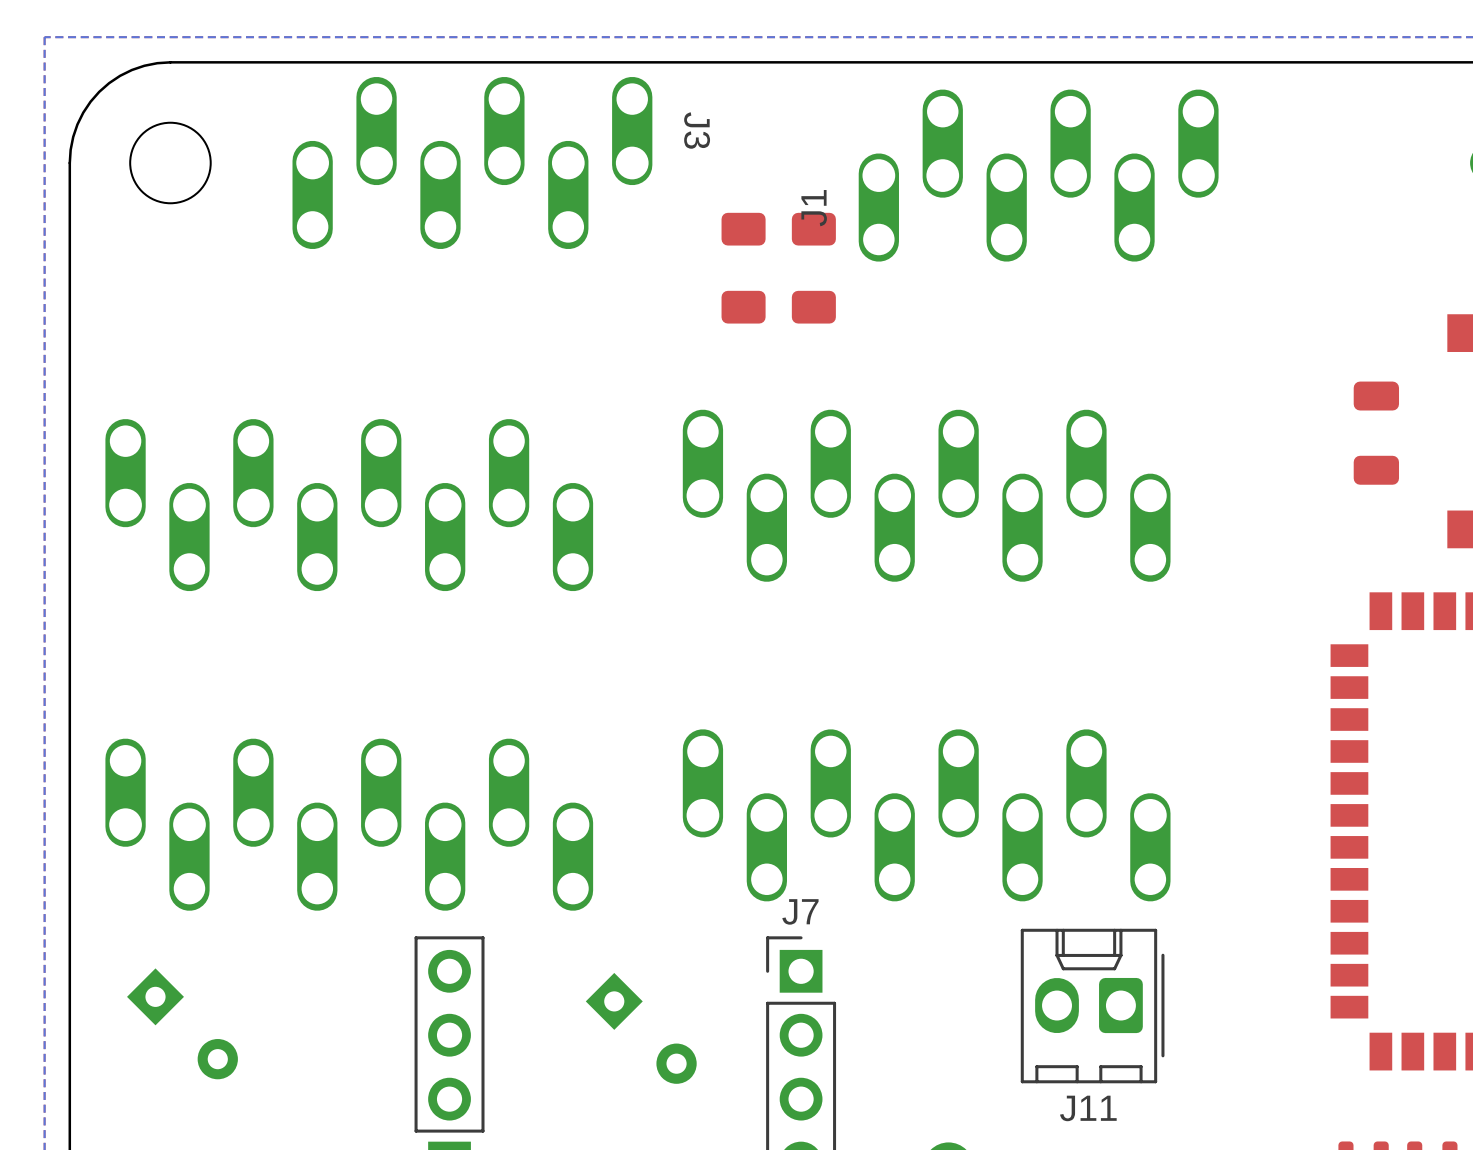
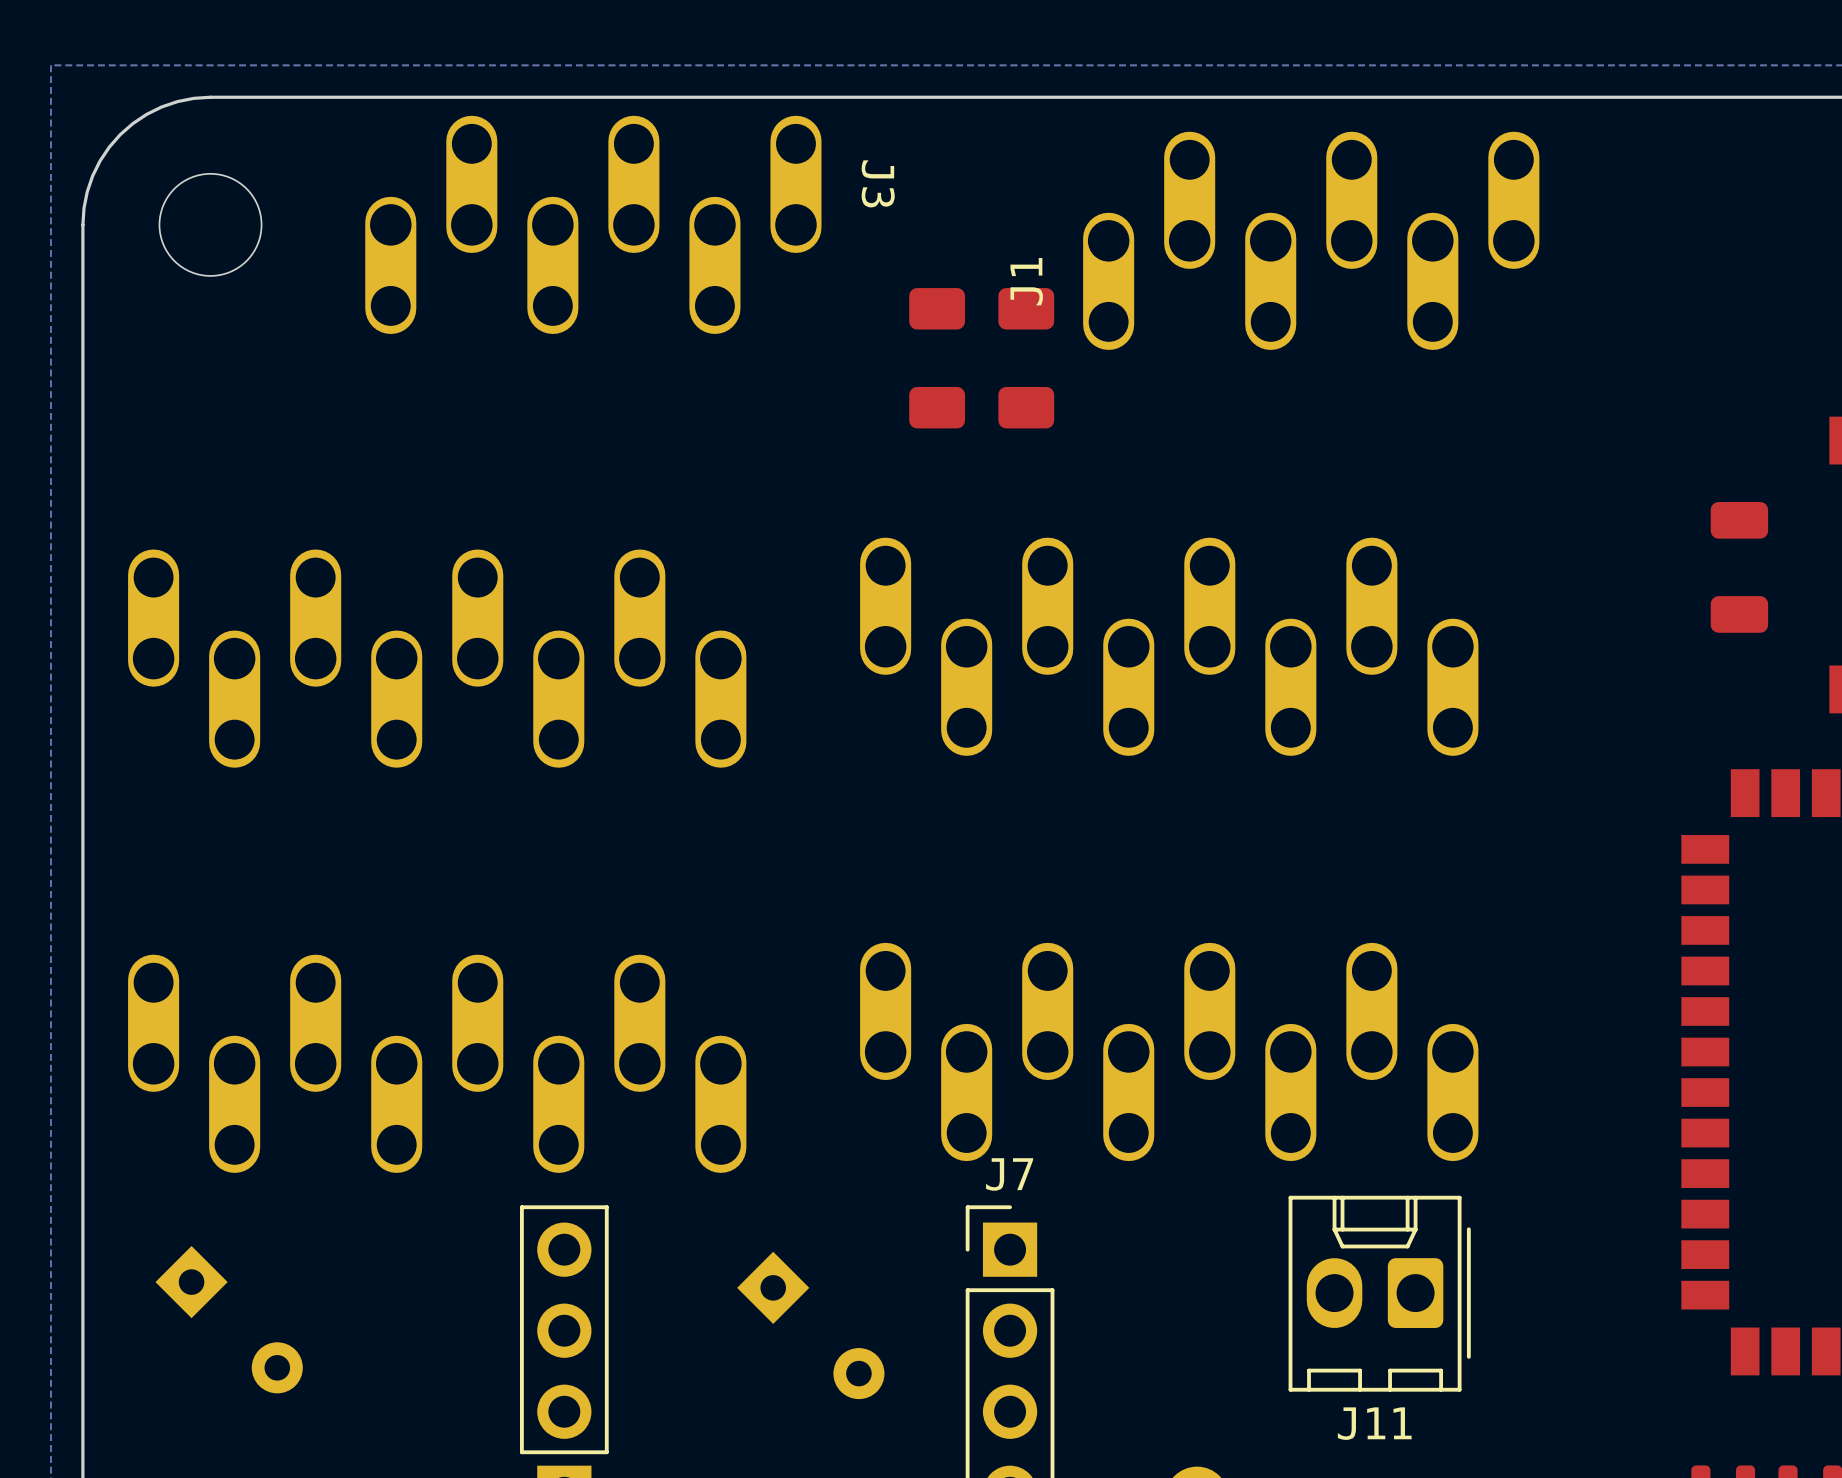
part footprint: [127, 968, 238, 1080] -> [155, 1245, 303, 1394]
part footprint: [585, 972, 697, 1084] -> [737, 1251, 885, 1400]

